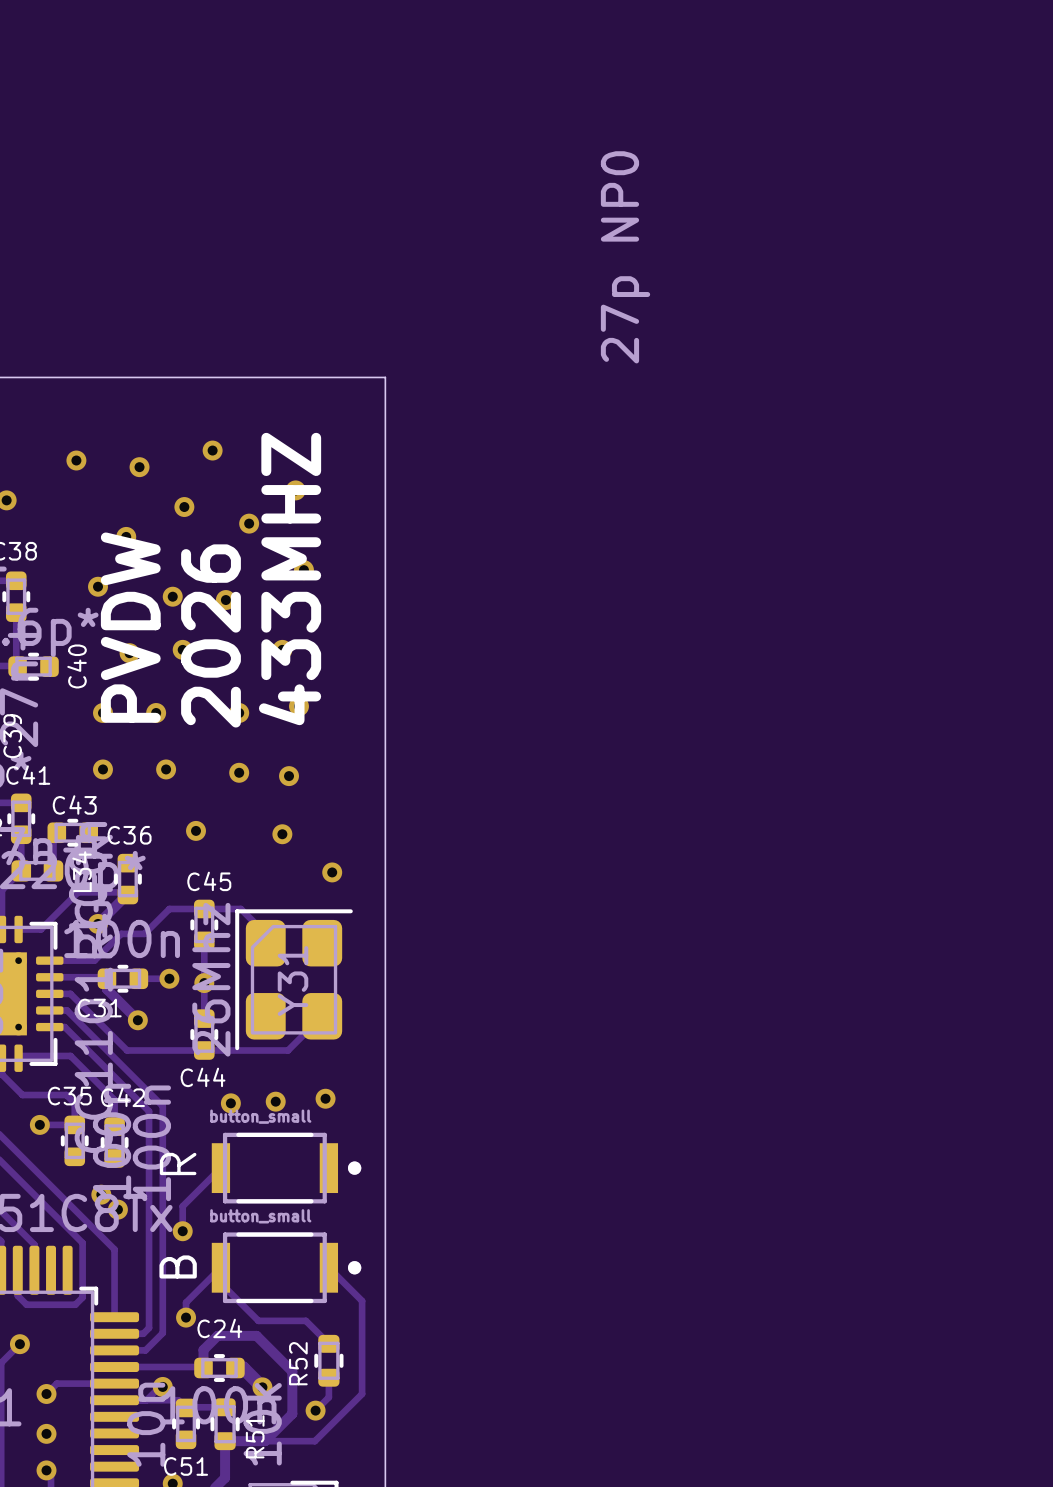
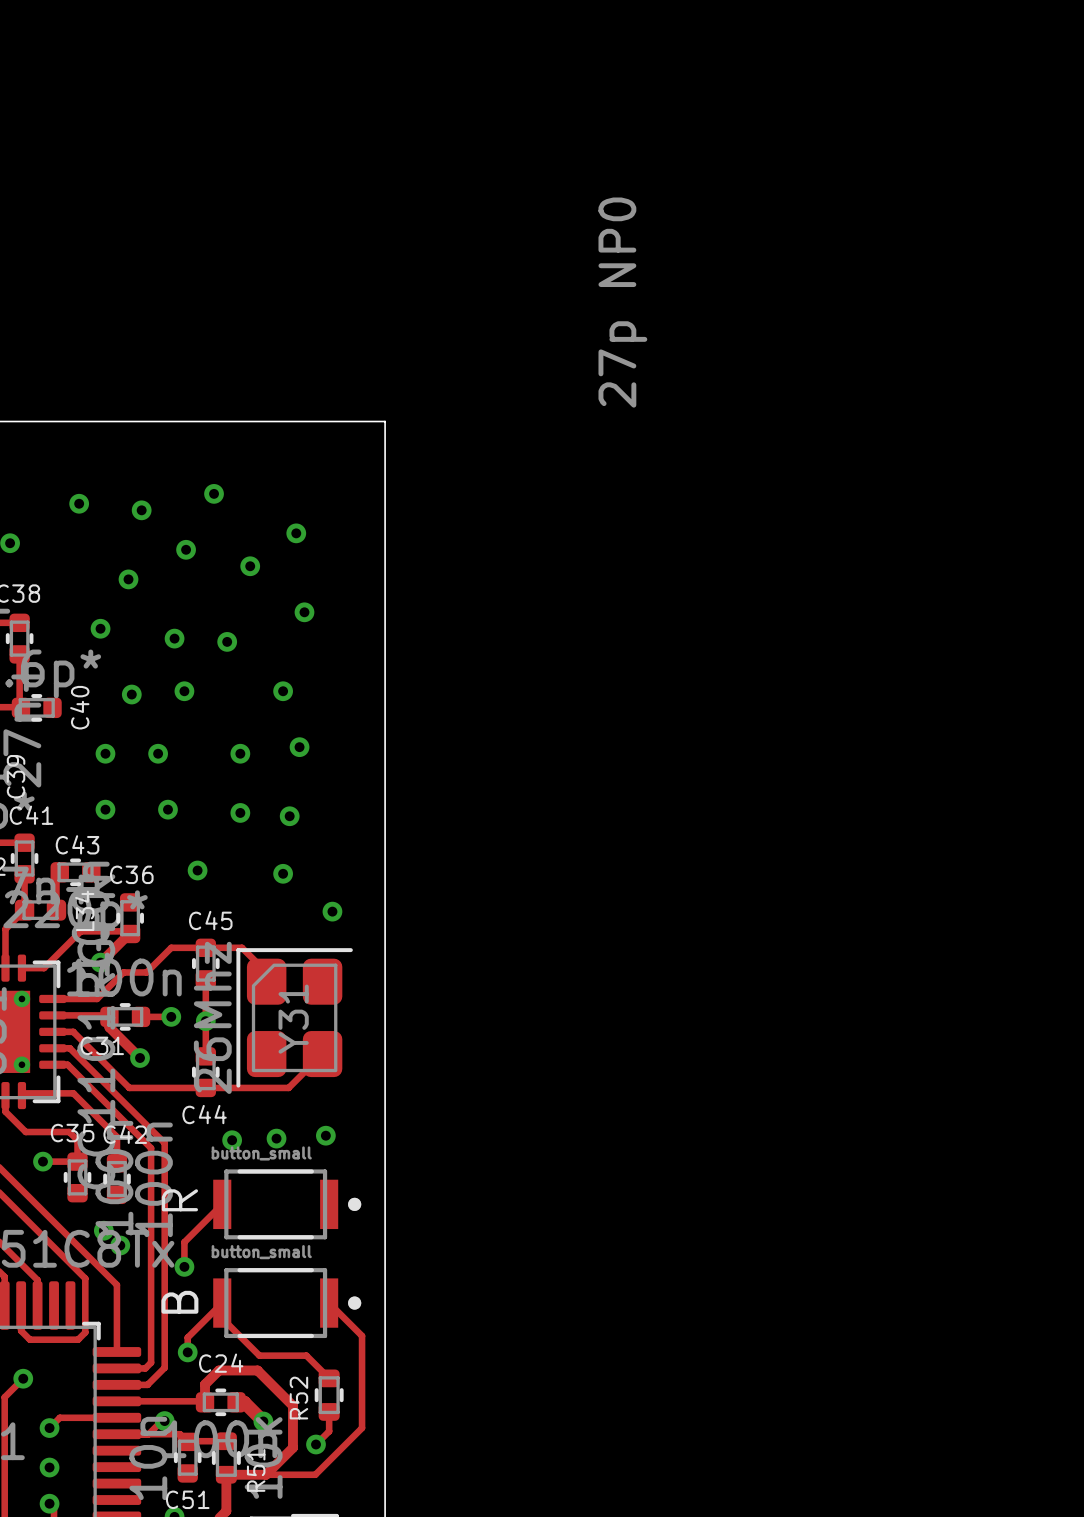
text: 433MHZ (290, 579) -> none
text: PVDW (130, 627) -> none
text: 2026 (211, 635) -> none

